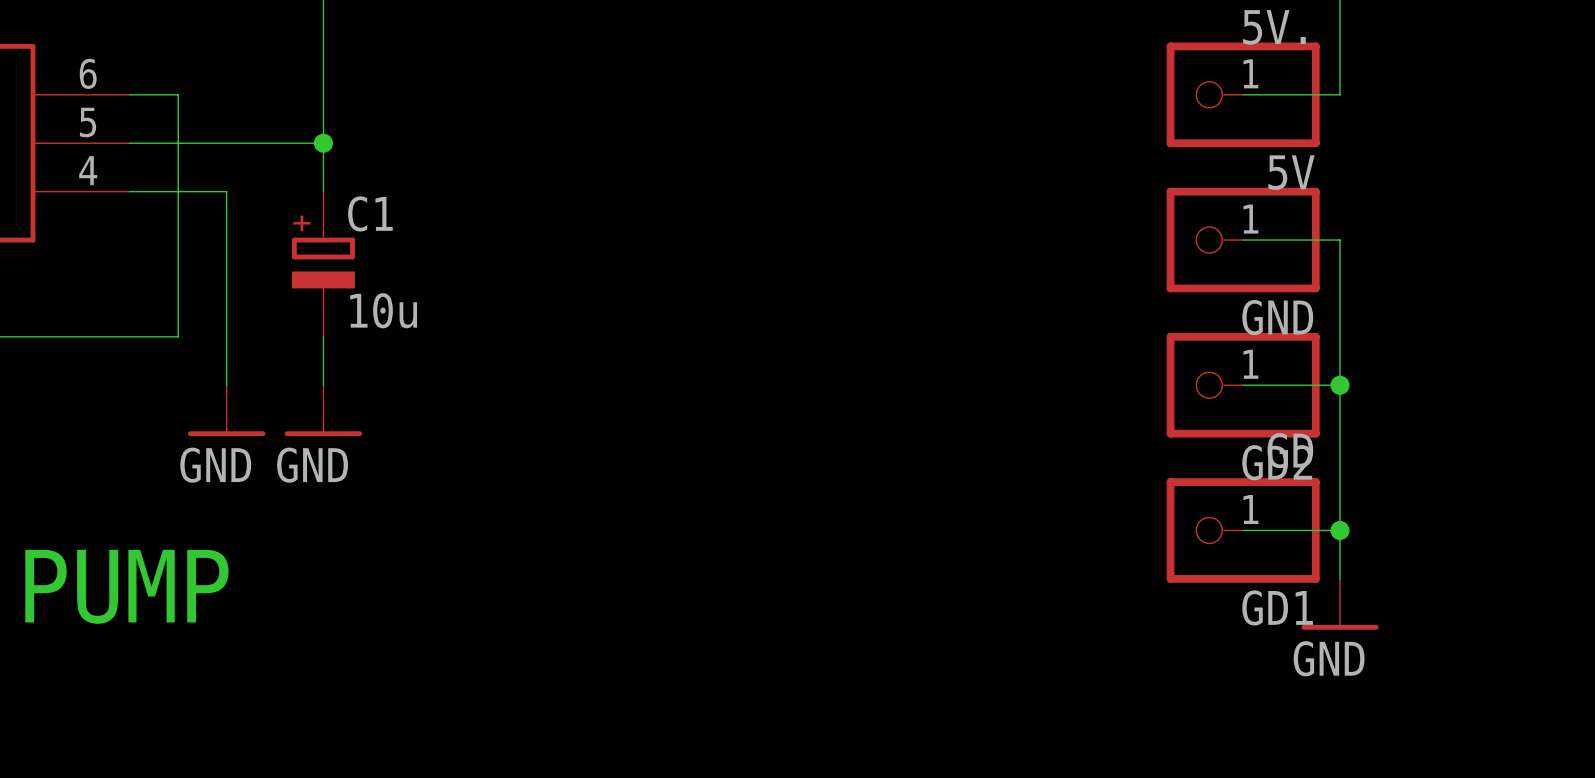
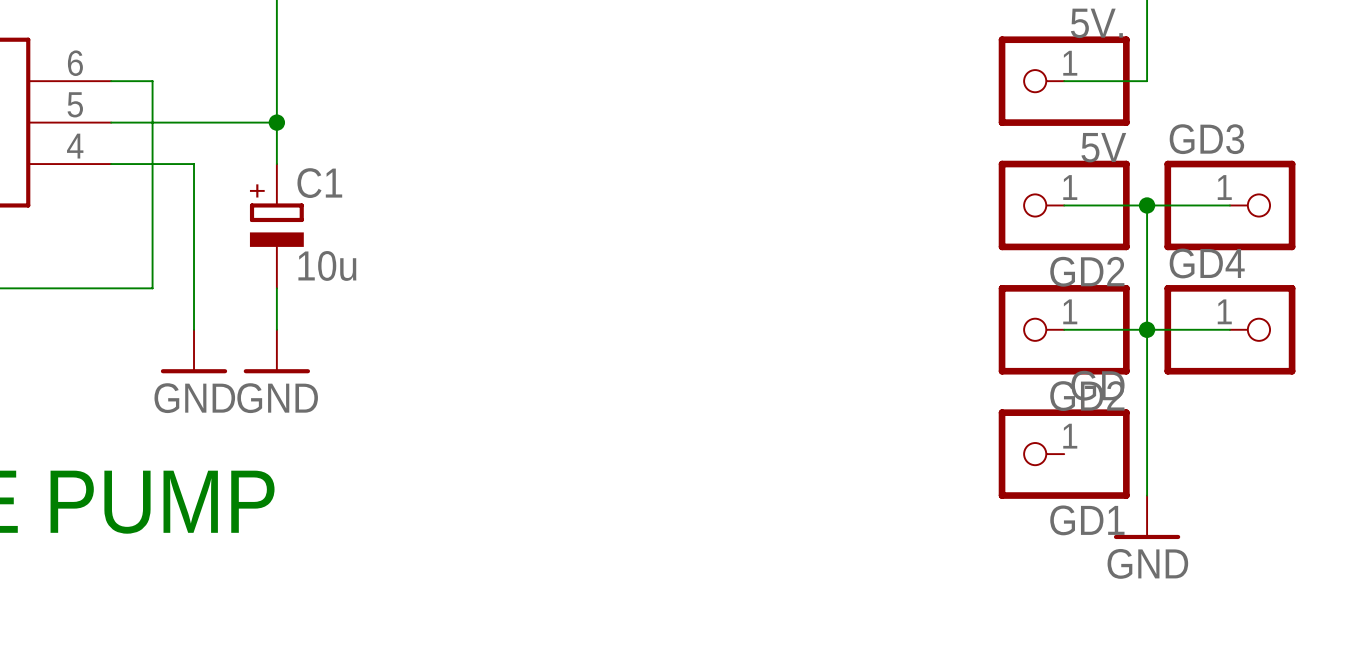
wire: none -> (1147, 205) (1229, 205)
junction: none -> (1147, 205)
GD3: none -> (1229, 205)
GND name: GND (1277, 317) -> GD2 (1087, 271)
GD4: none -> (1229, 329)
wire: (1243, 530) (1339, 530) -> (1147, 329) (1229, 329)
junction: (1339, 530) -> none

